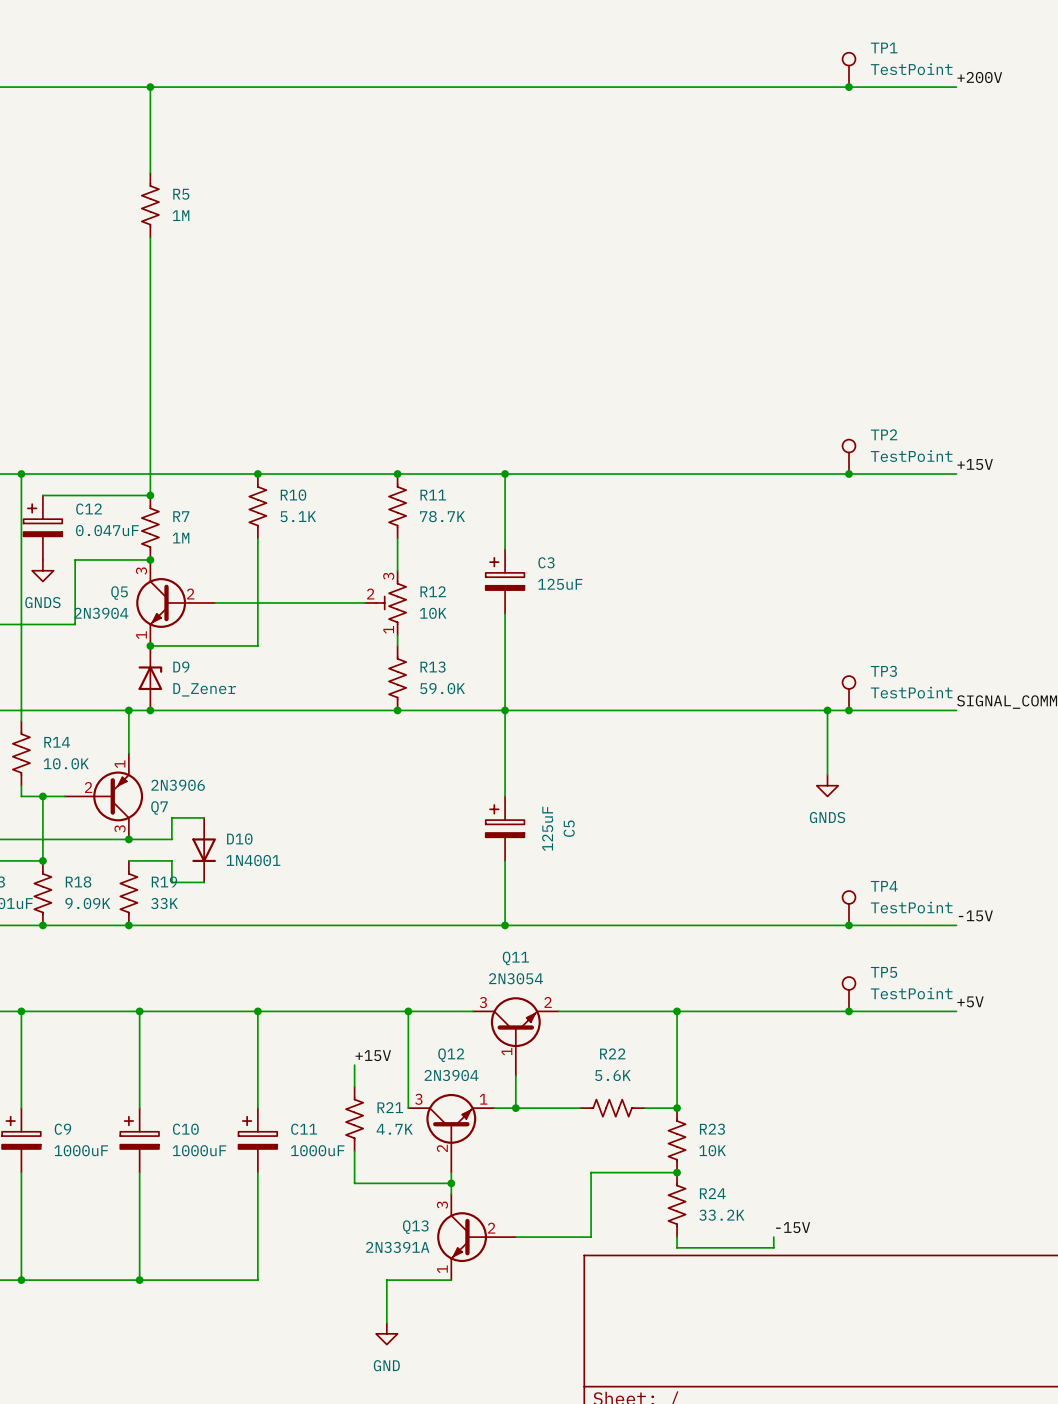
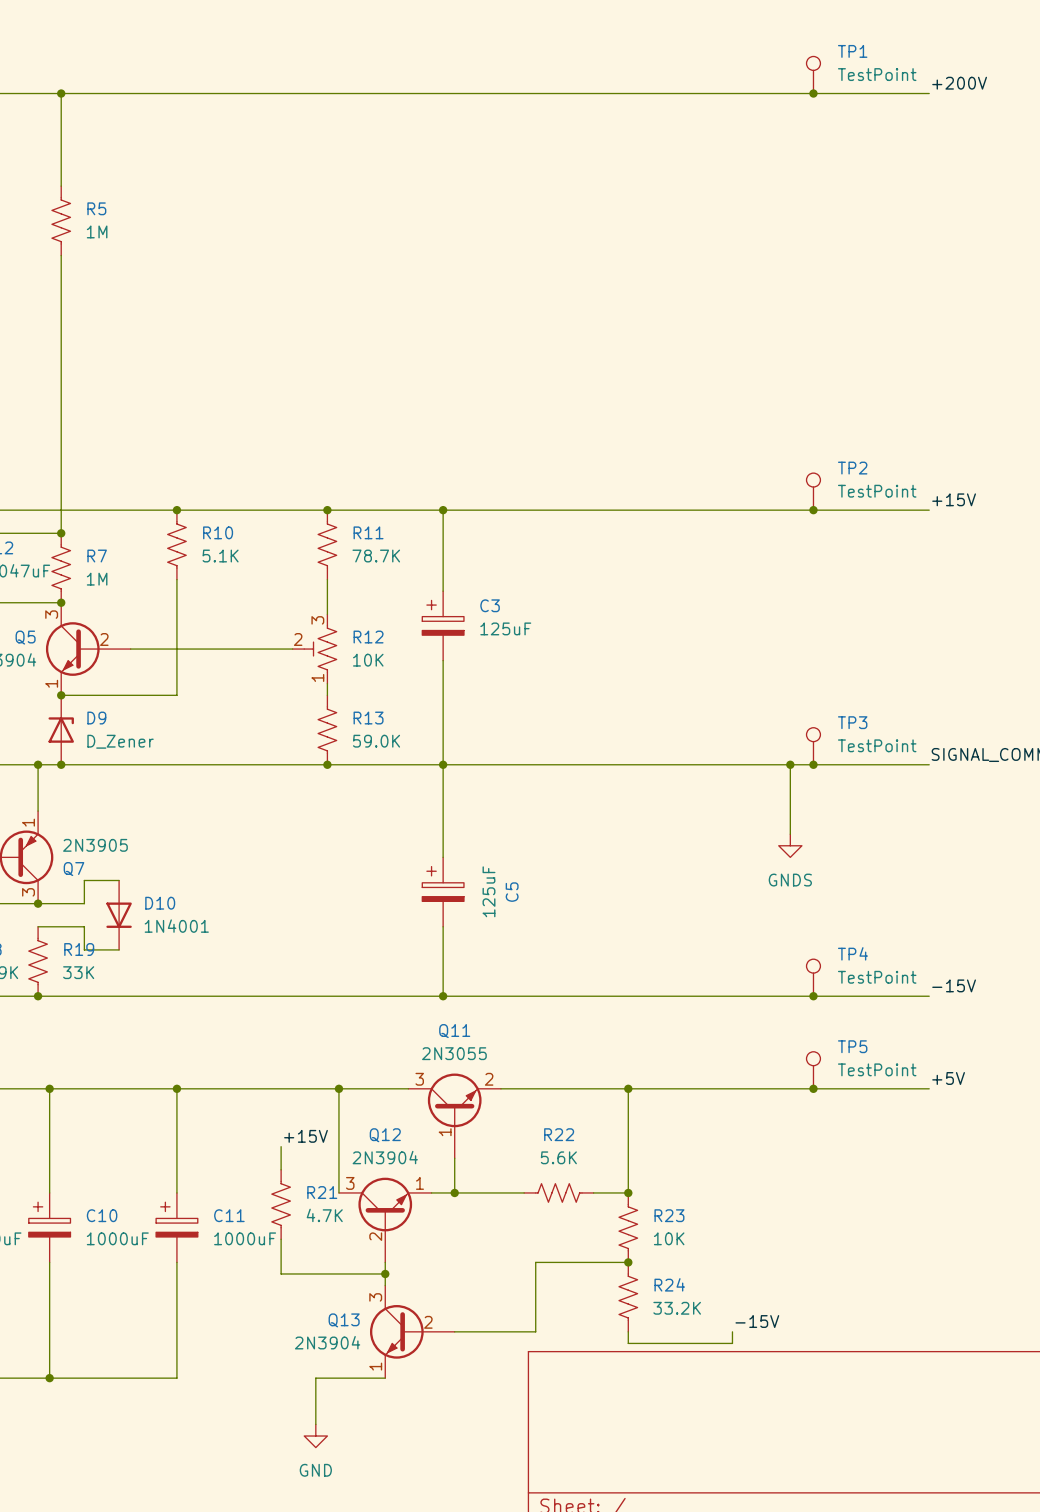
Q7 value: 2N3906 (178, 785) -> 2N3905 (95, 845)
Q11 value: 2N3054 (516, 978) -> 2N3055 (454, 1053)
Q13 value: 2N3391A (397, 1247) -> 2N3904 (327, 1342)

